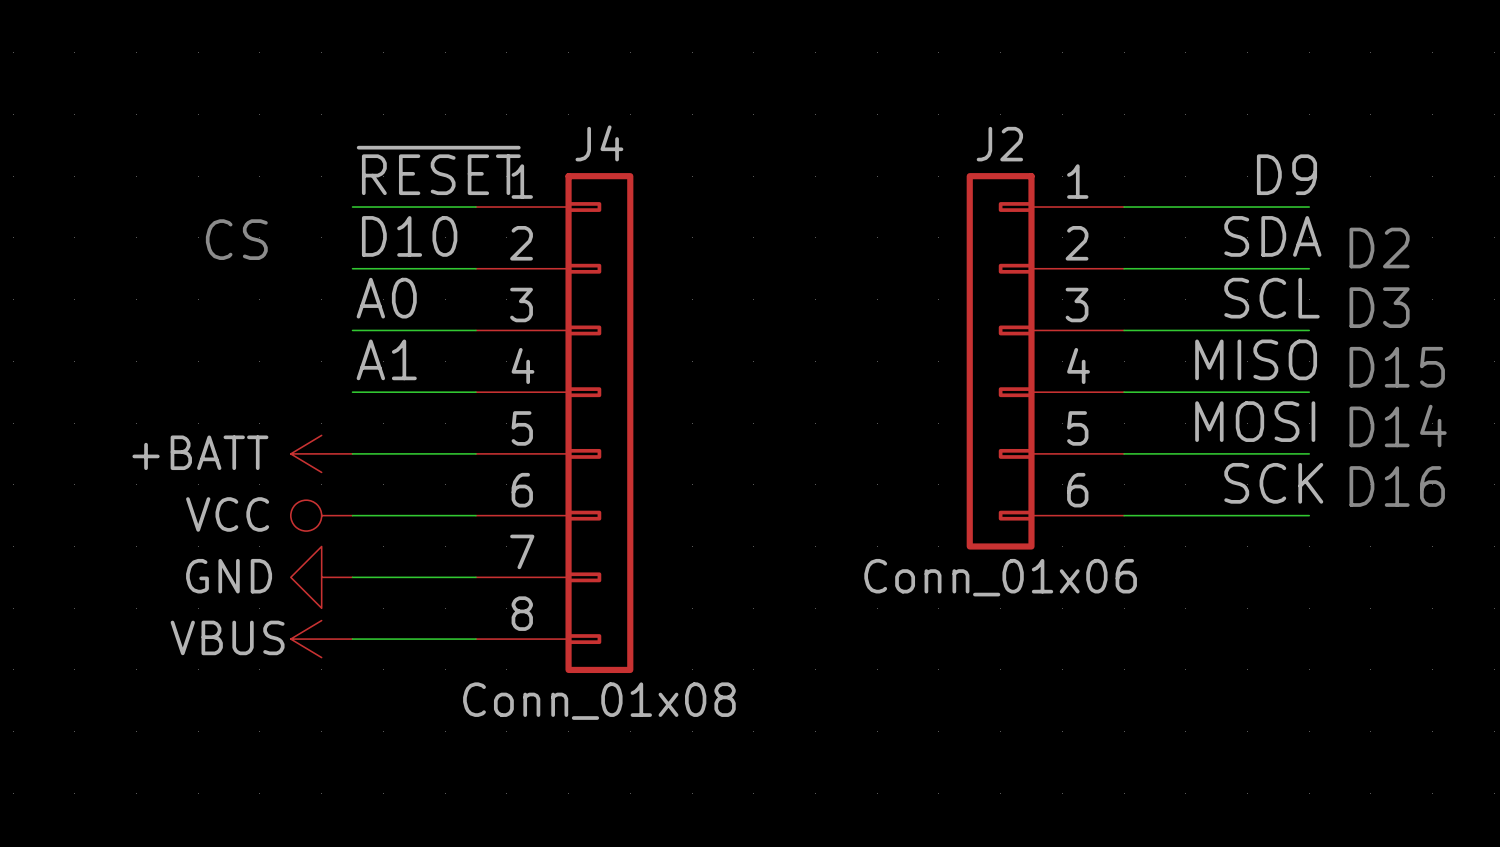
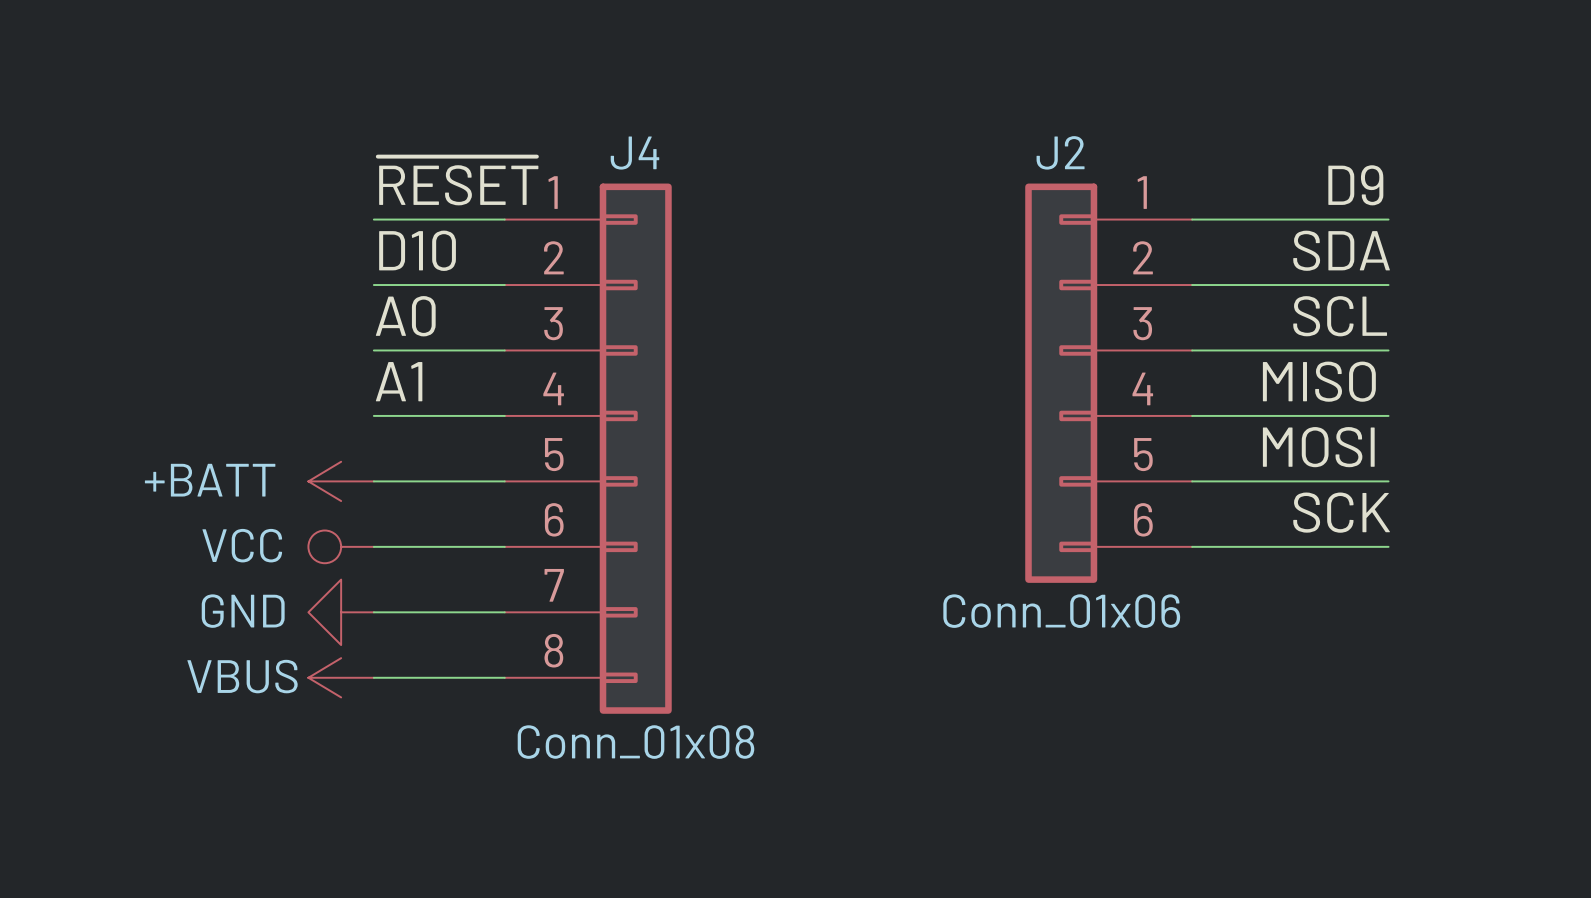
text: CS (236, 239) -> none
text: D2 (1379, 248) -> none
text: D3 (1379, 307) -> none
text: D15 (1397, 367) -> none
text: D14 (1398, 426) -> none
text: D16 (1397, 486) -> none

